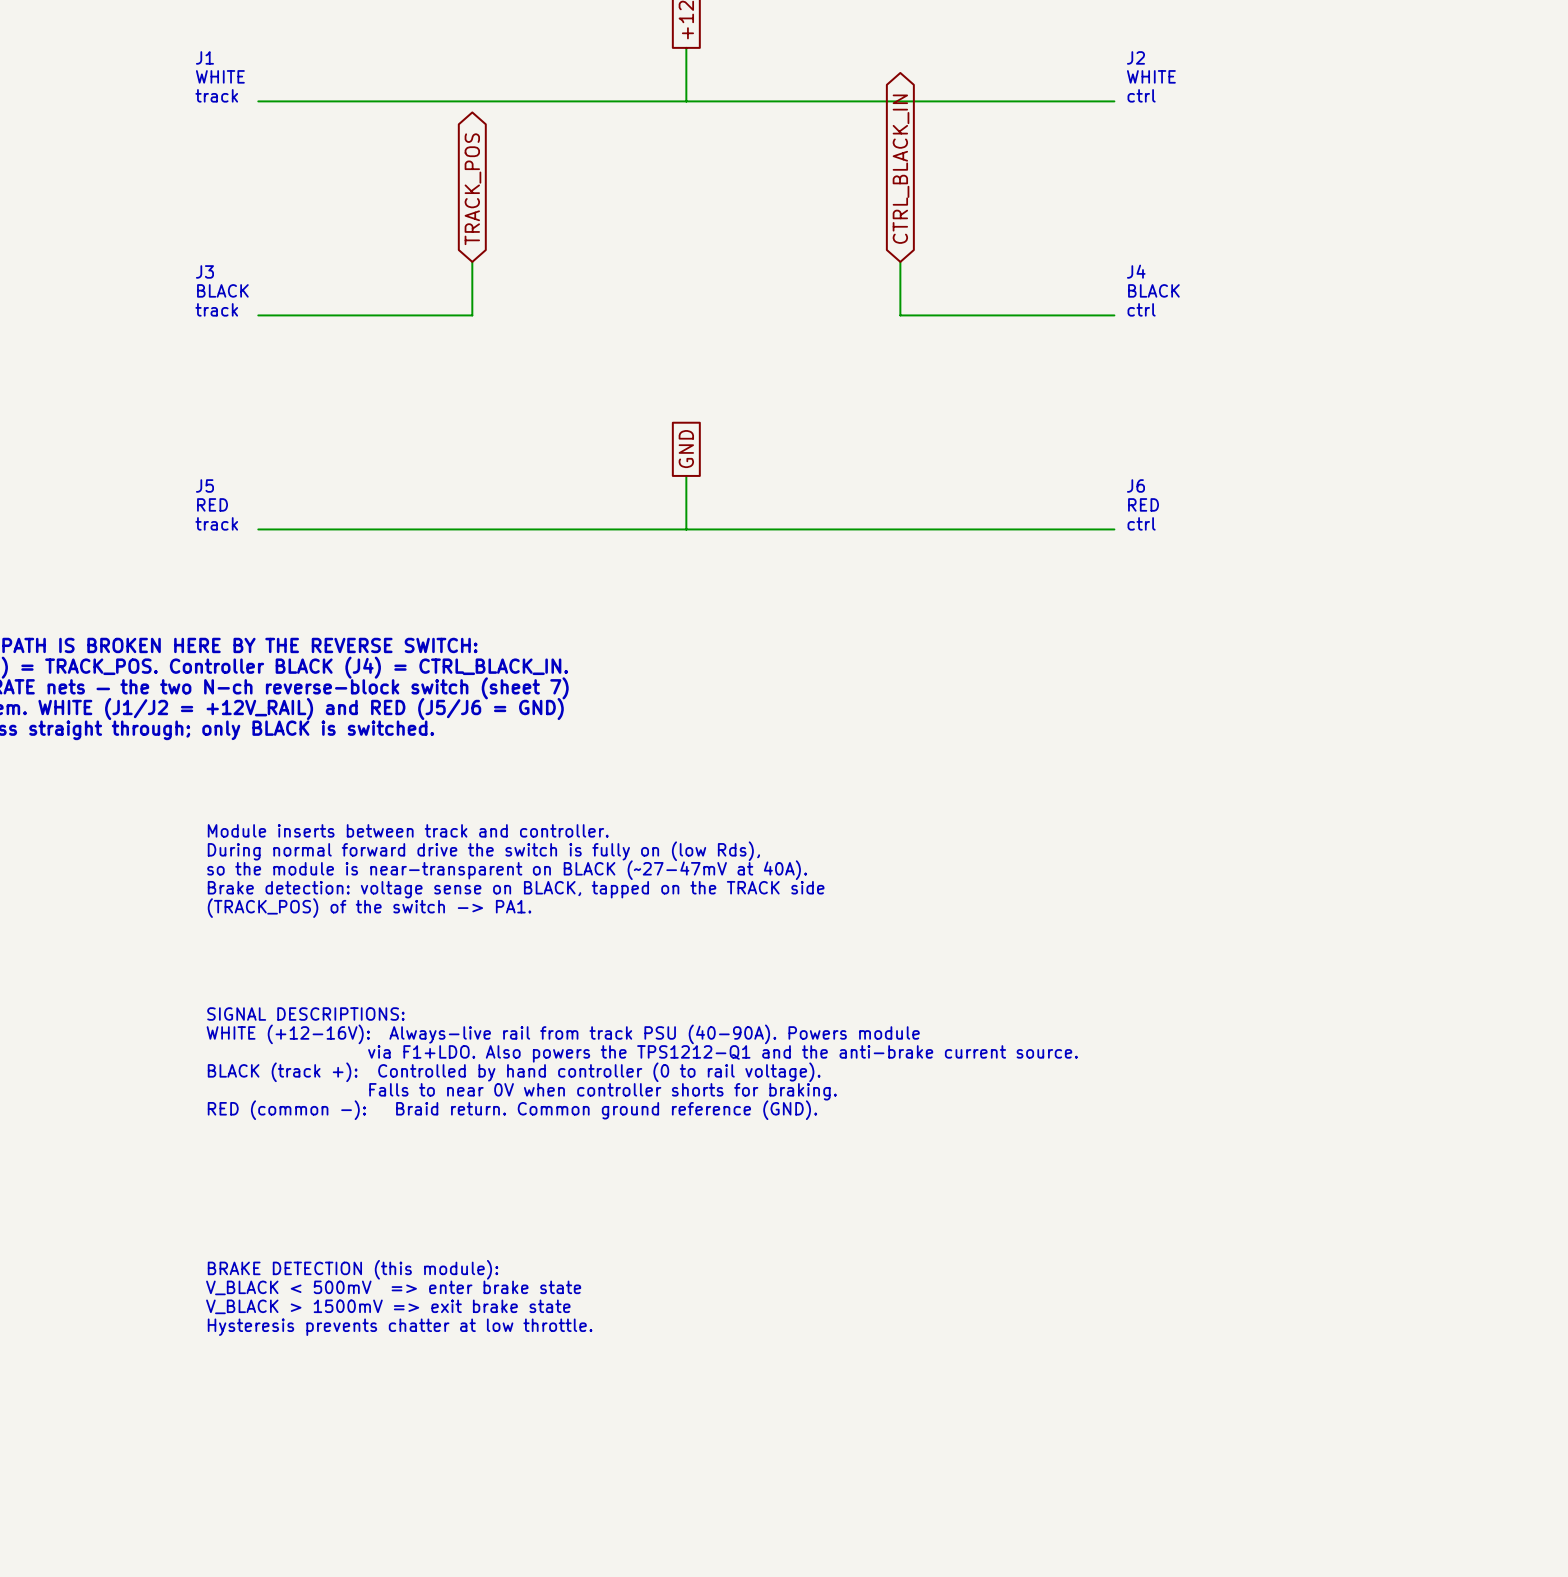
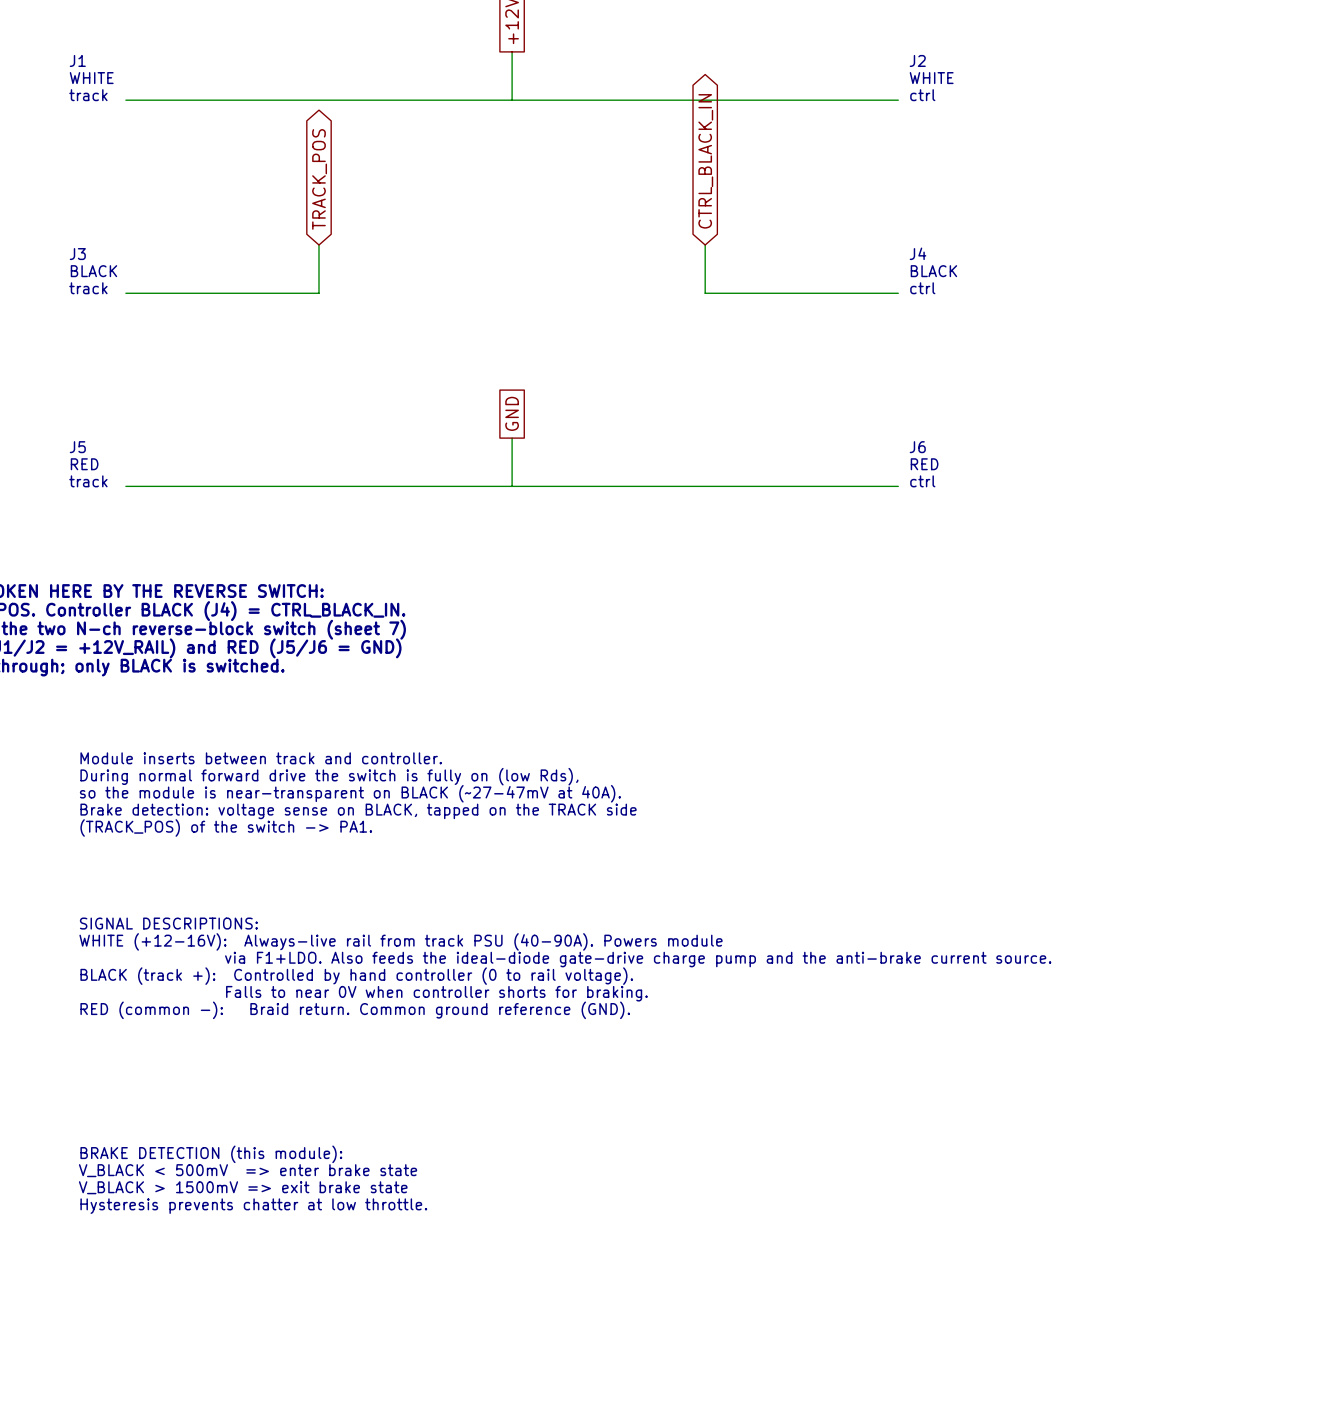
text: via F1+LDO. Also powers the TPS1212-Q1 and the anti-brake current source. (722, 1053) -> via F1+LDO. Also feeds the ideal-diode gate-drive charge pump and the anti-brake current source. (638, 959)

